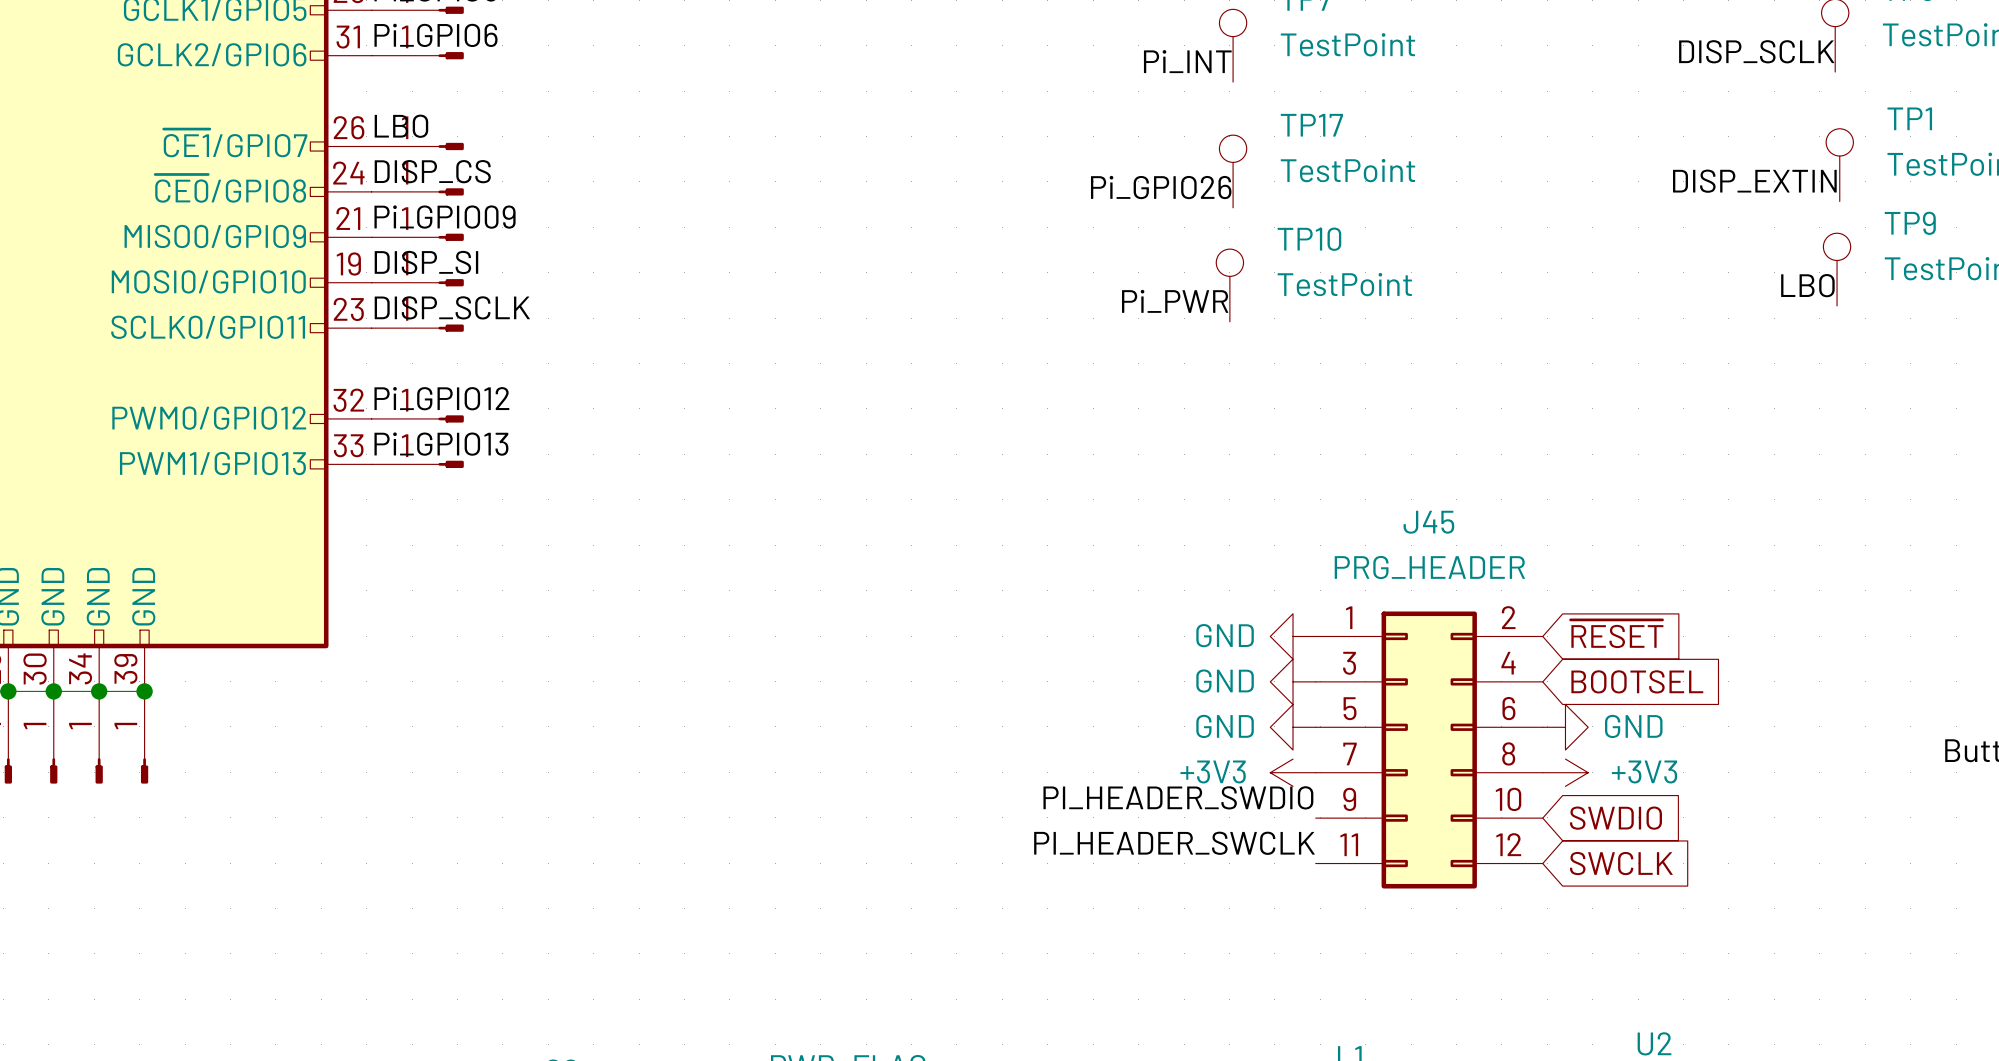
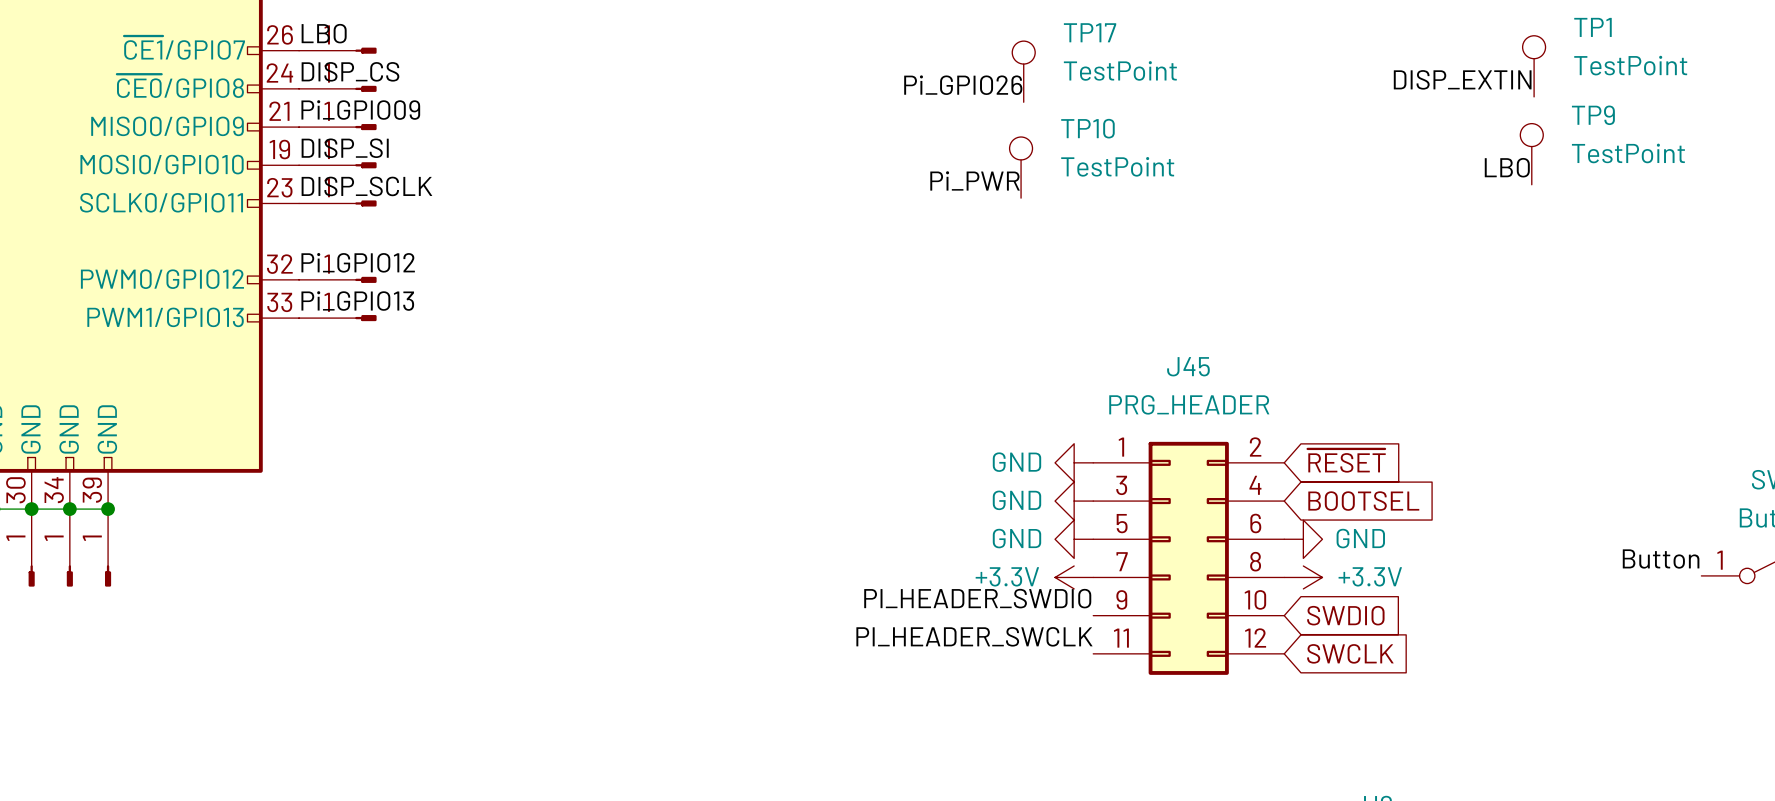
power symbol: +3V3 (1293, 772) -> +3.3V (1074, 577)
power symbol: +3V3 (1565, 772) -> +3.3V (1303, 577)

